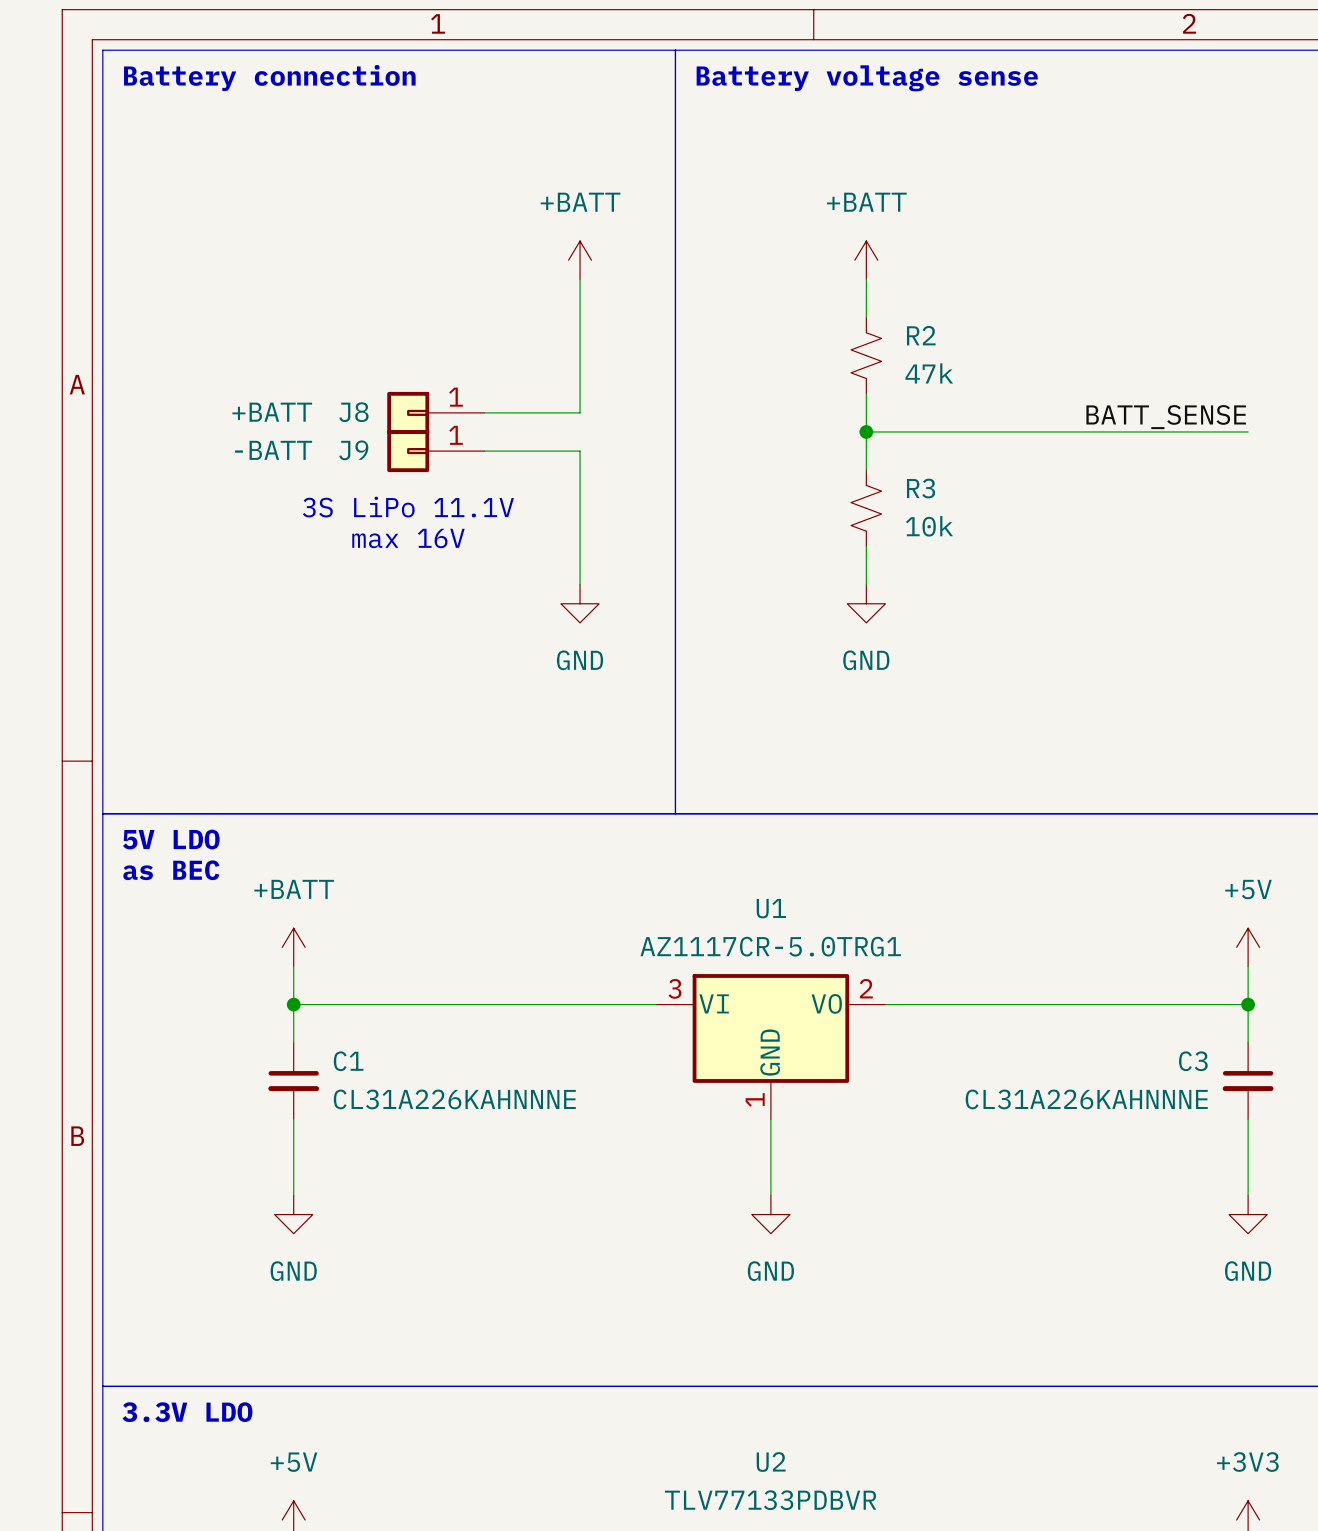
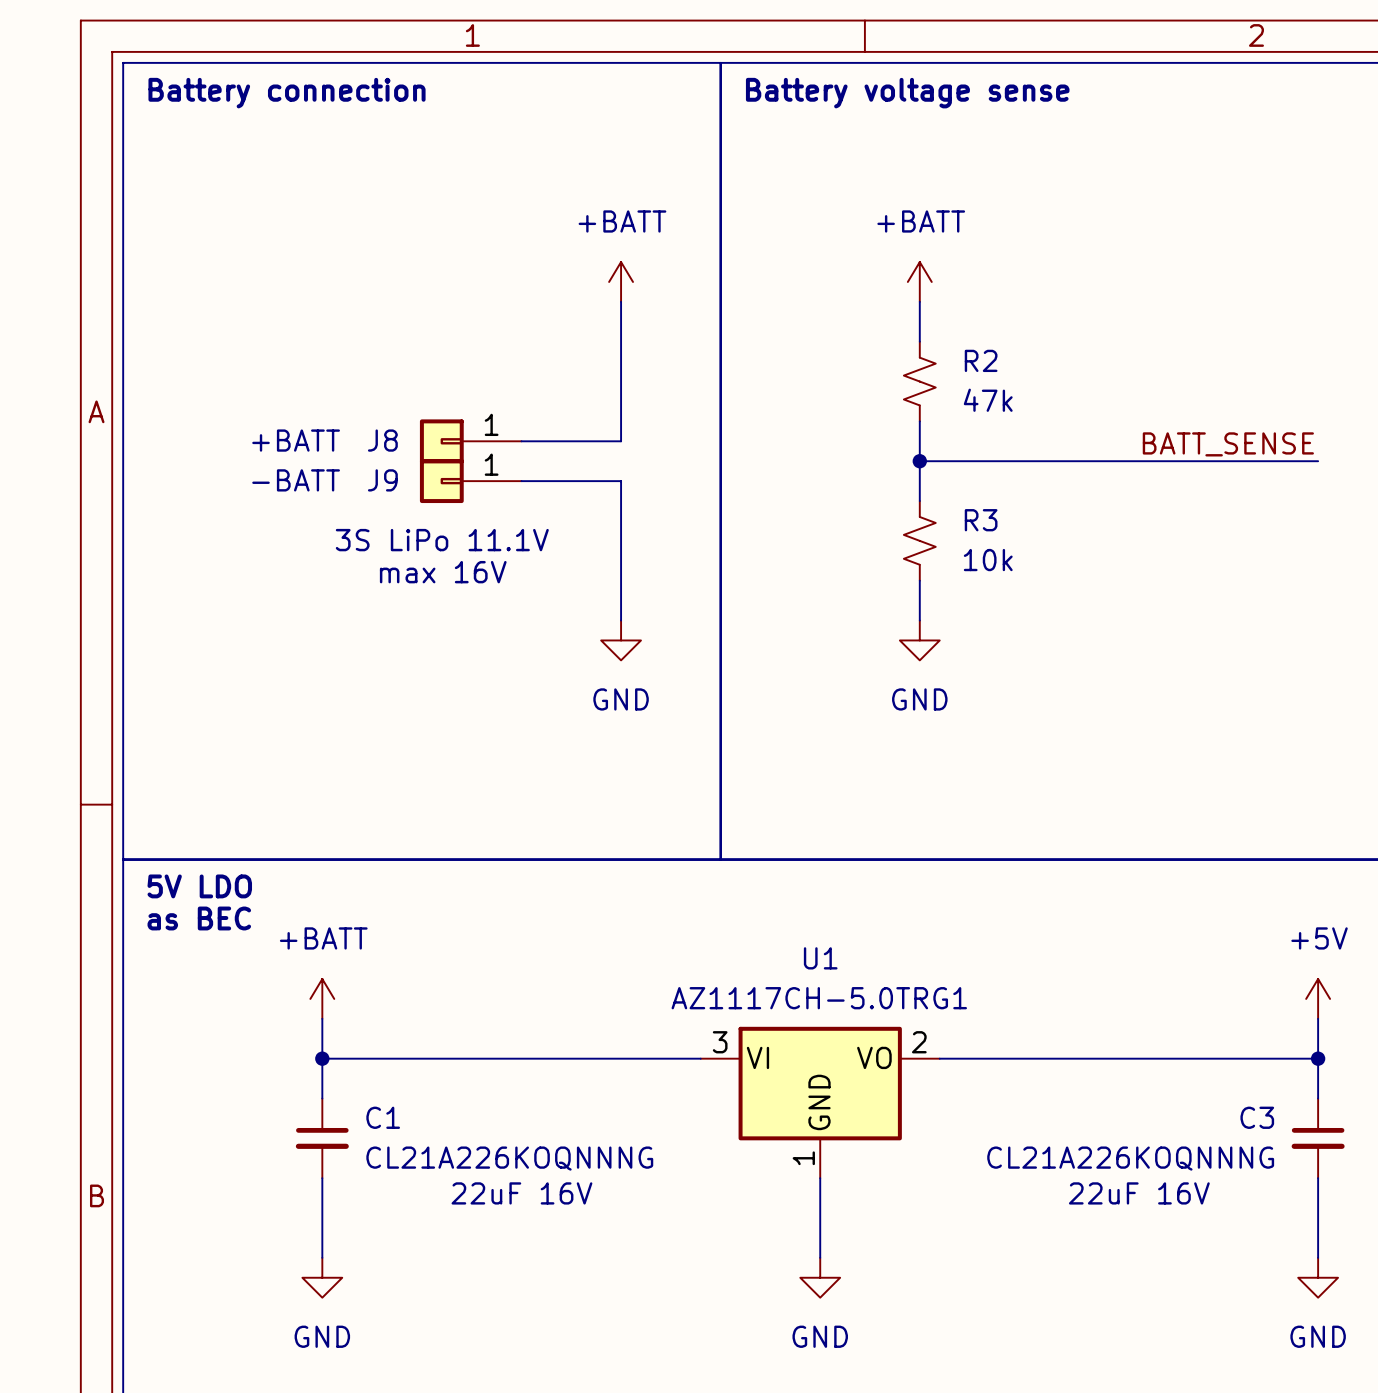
U1 value: AZ1117CR-5.0TRG1 (770, 946) -> AZ1117CH-5.0TRG1 (819, 998)
C1 value: CL31A226KAHNNNE (454, 1099) -> CL21A226KOQNNNG (509, 1158)
C3 value: CL31A226KAHNNNE (1086, 1099) -> CL21A226KOQNNNG (1130, 1158)
text: none -> 22uF 16V (521, 1193)
text: none -> 22uF 16V (1139, 1193)

